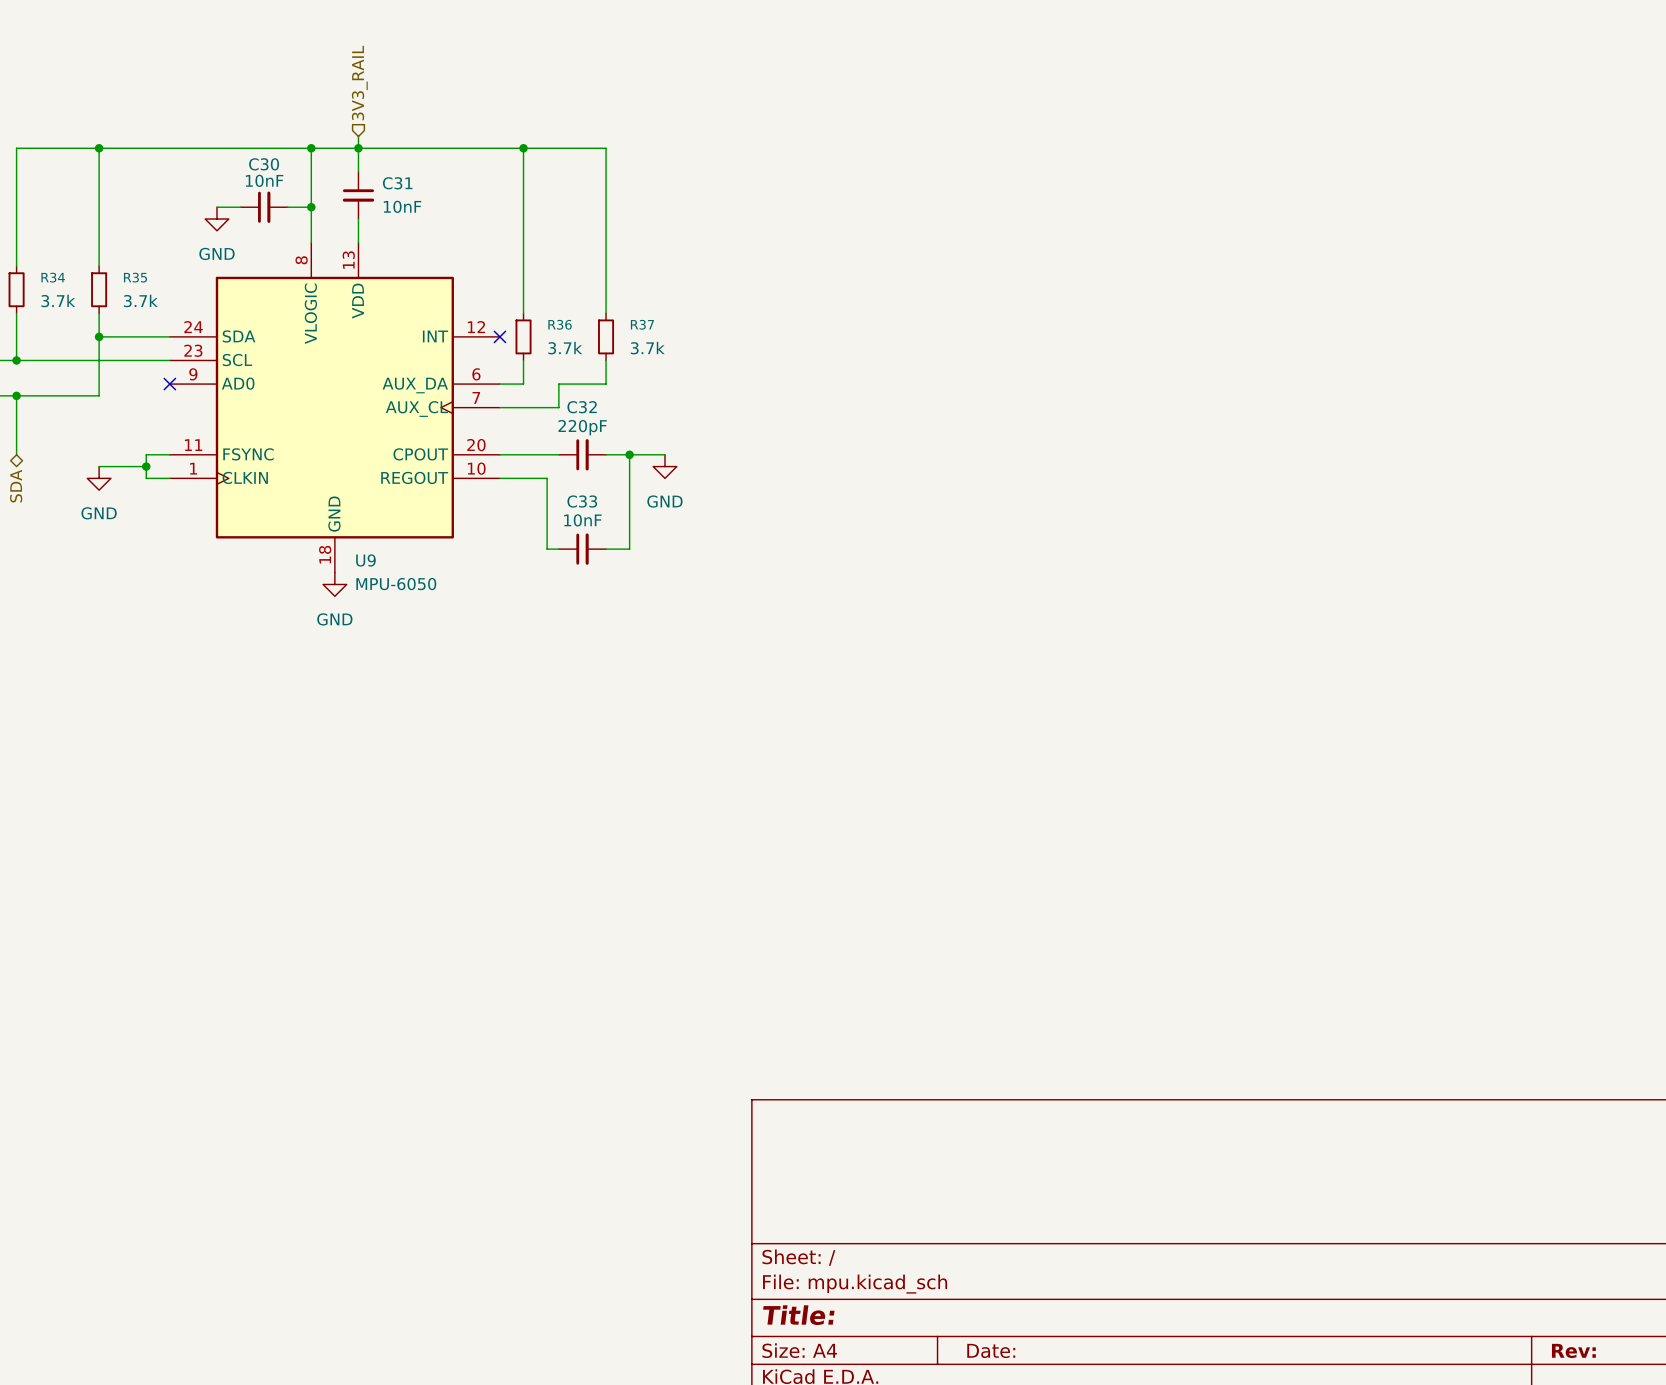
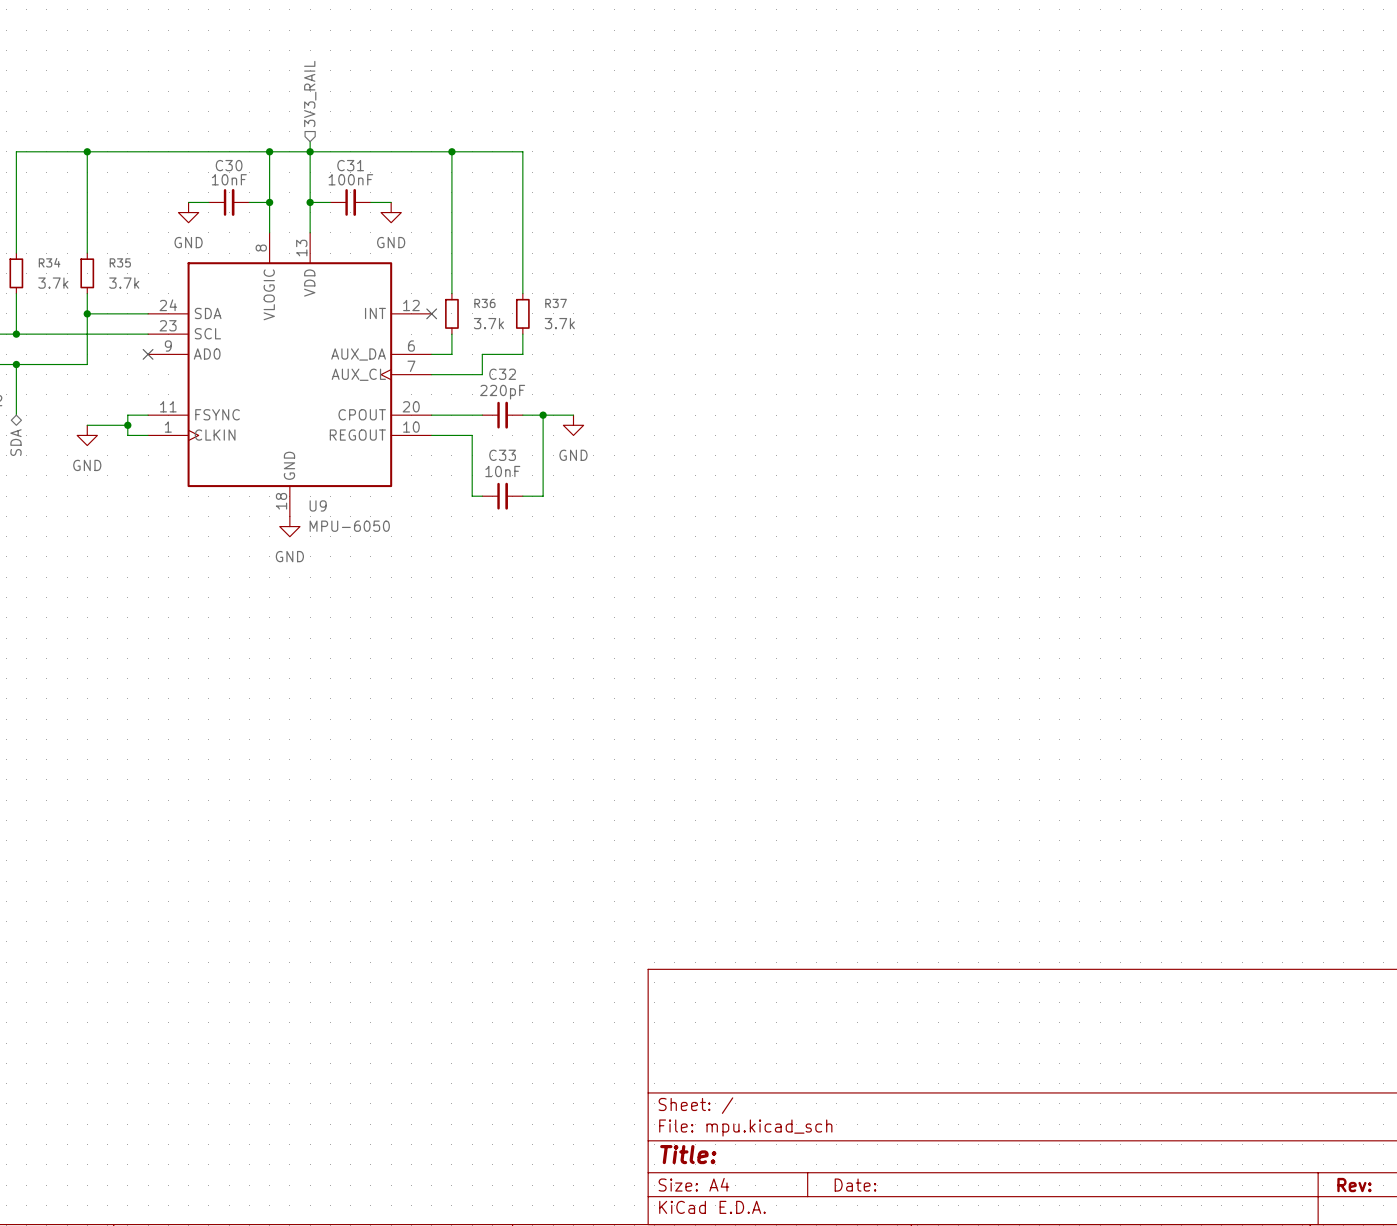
C31 rotation: 0° (358, 195) -> 90° counterclockwise (350, 202)
C31 position: (358, 195) -> (350, 202)
C31 value: 10nF (402, 206) -> 100nF (350, 179)
wire: none -> (310, 202) (330, 202)
junction: none -> (310, 202)
wire: none -> (370, 202) (391, 202)
power symbol: none -> GND (391, 212)

